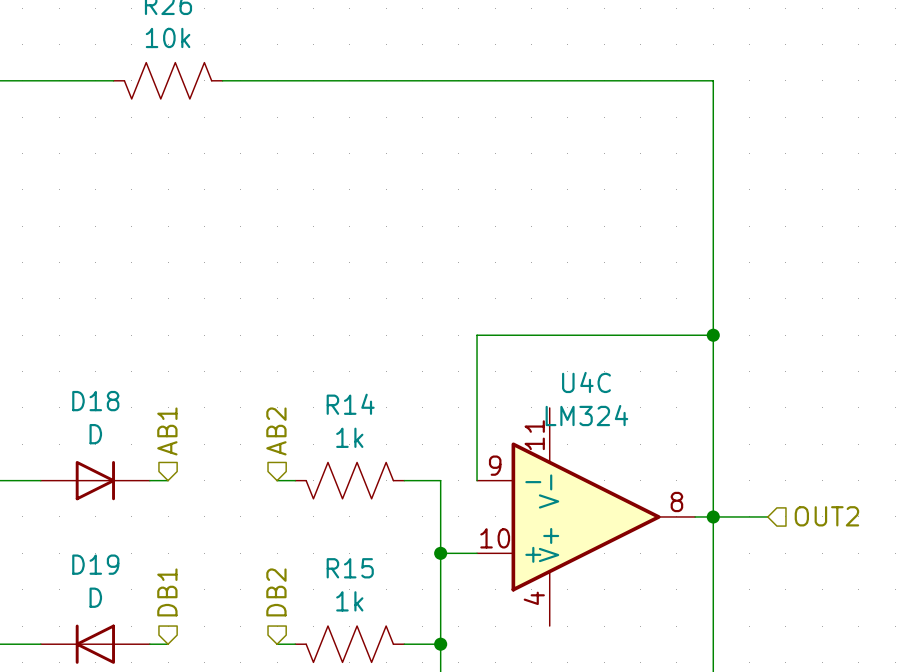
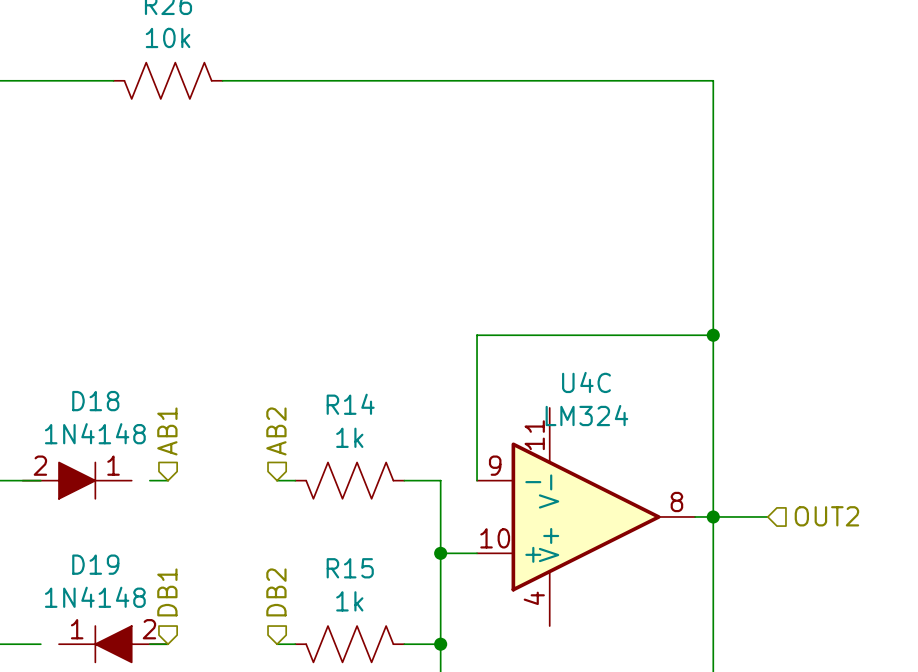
D18 value: D (95, 434) -> 1N4148 (95, 433)
D18 symbol: [40, 461, 150, 501] -> [22, 462, 132, 499]
D19 value: D (95, 597) -> 1N4148 (95, 597)
D19 symbol: [40, 624, 150, 664] -> [59, 626, 169, 663]

